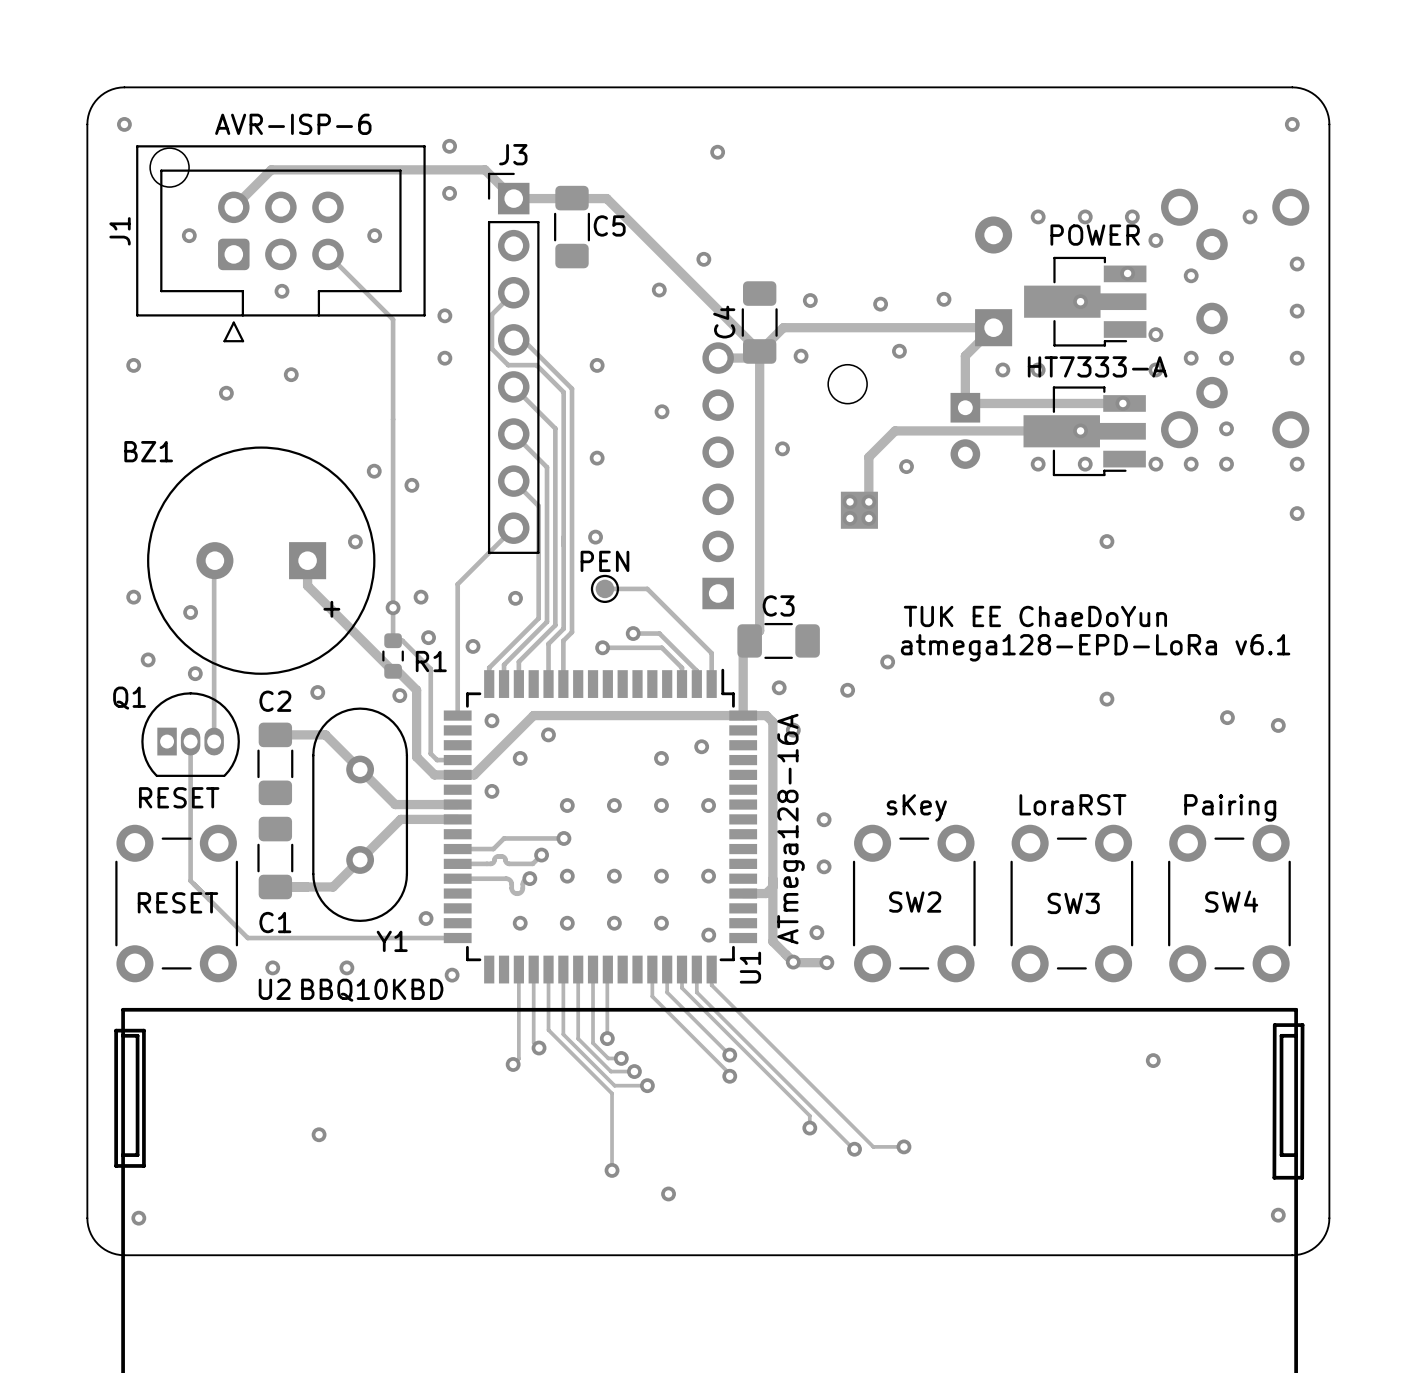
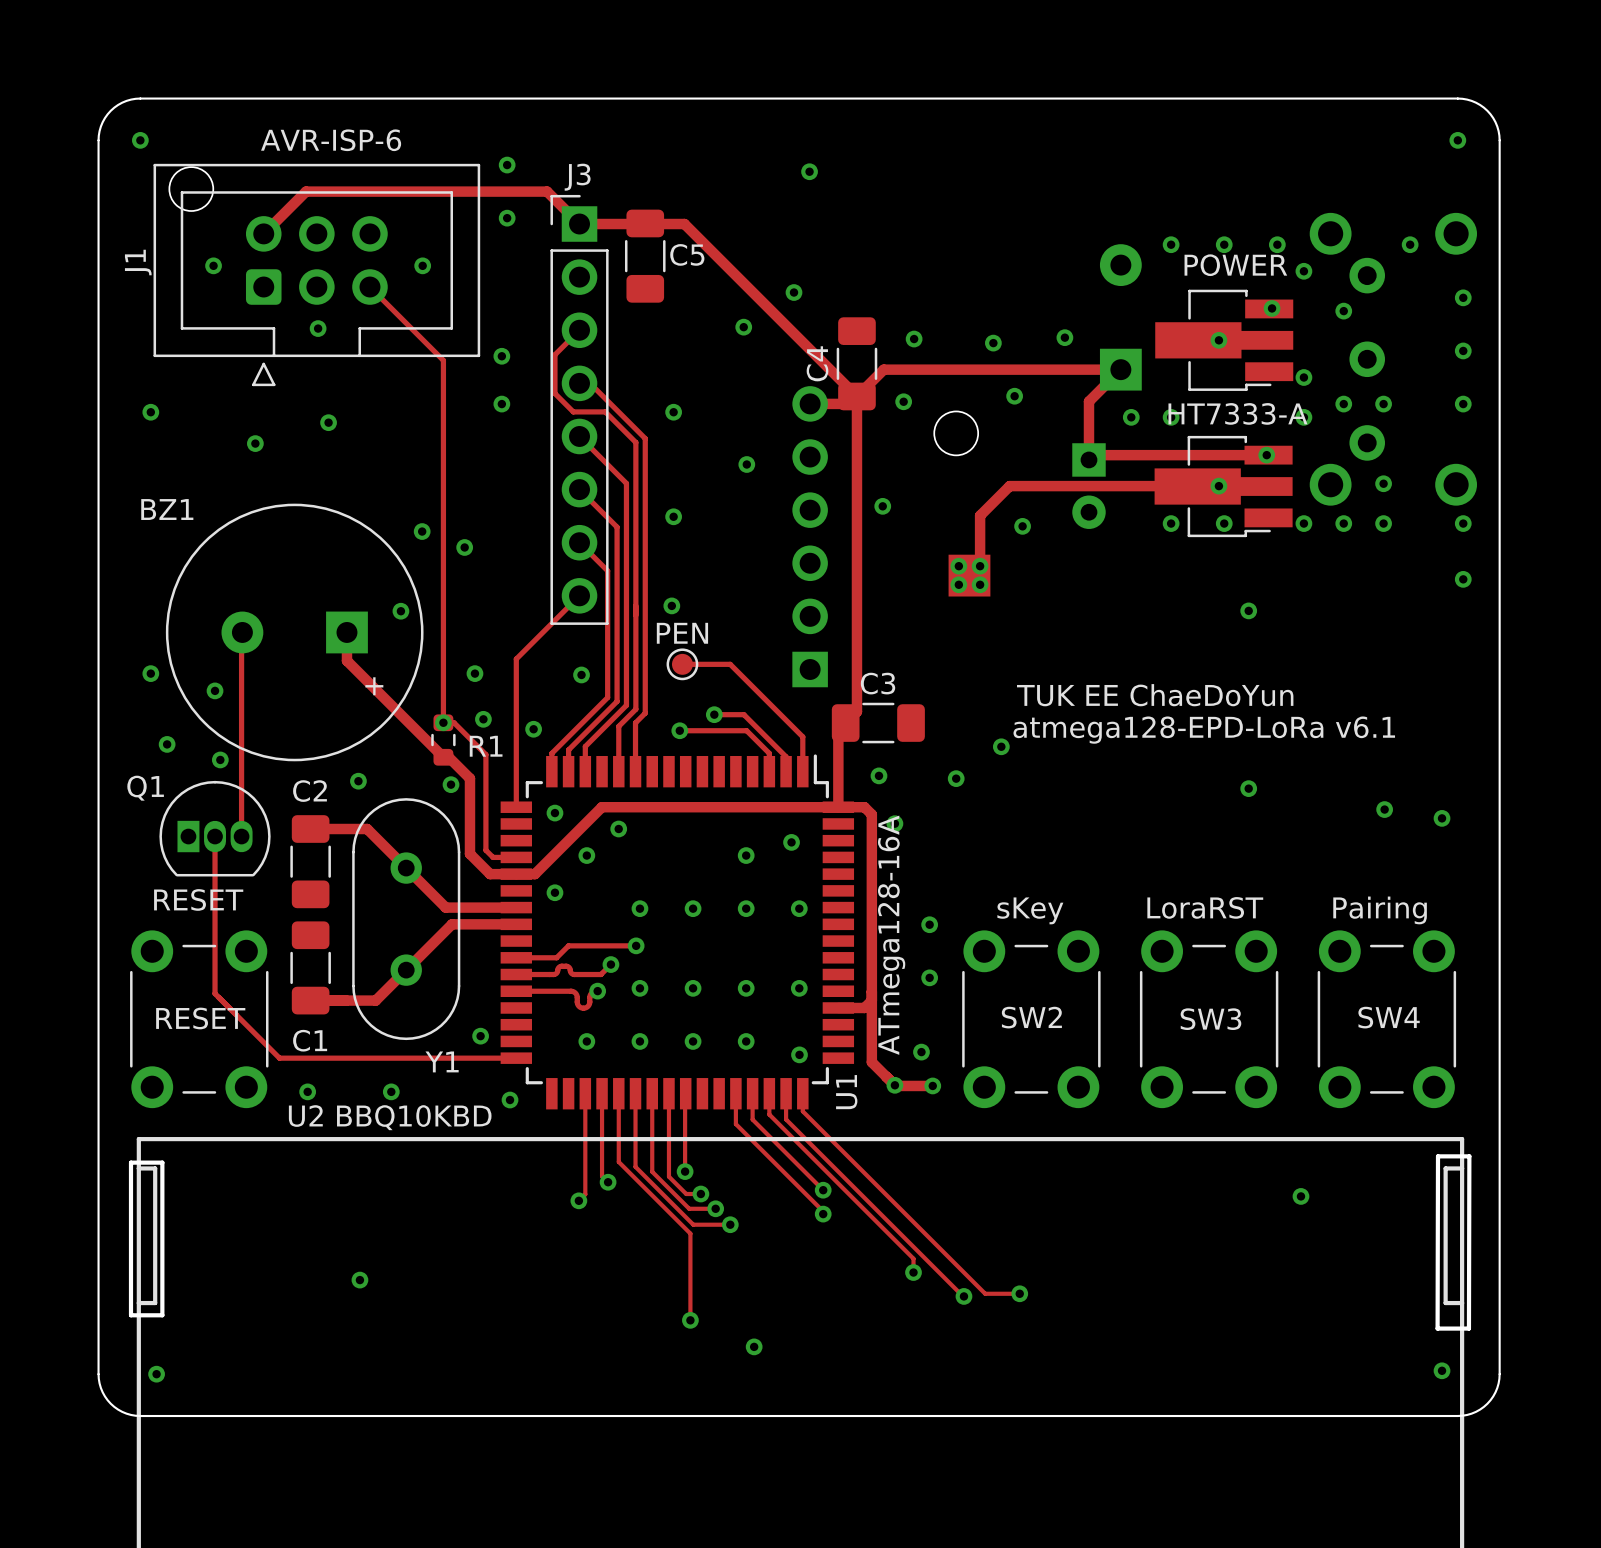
via position: (393, 607) -> (443, 722)

